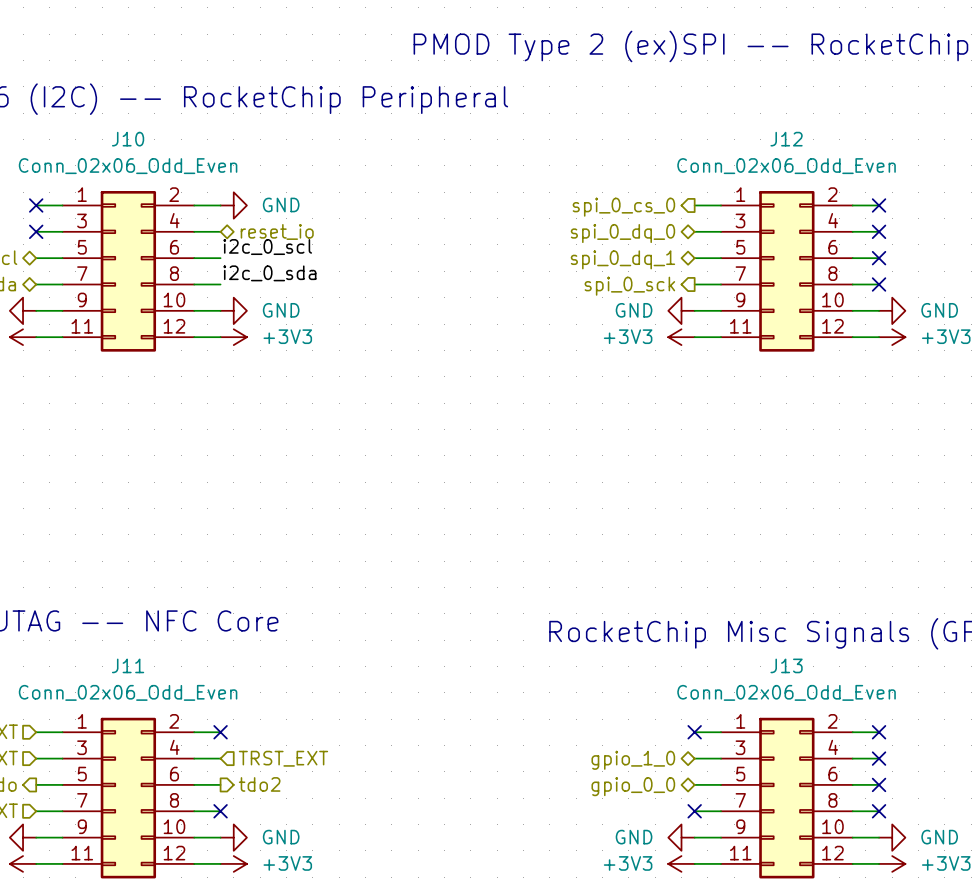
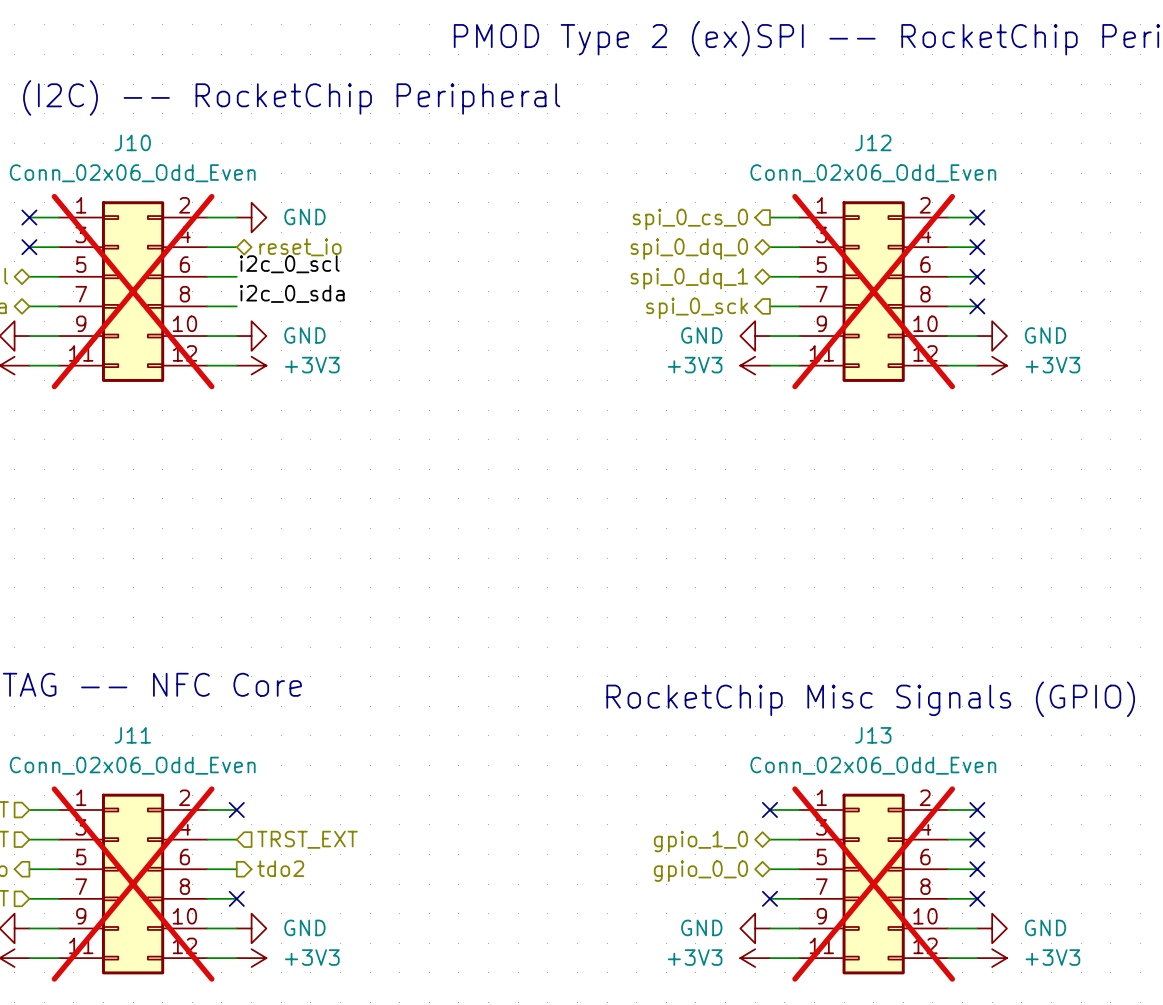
J10 do-not-place cross: none -> (133, 291)
J12 do-not-place cross: none -> (873, 291)
J11 do-not-place cross: none -> (133, 884)
J13 do-not-place cross: none -> (873, 884)

